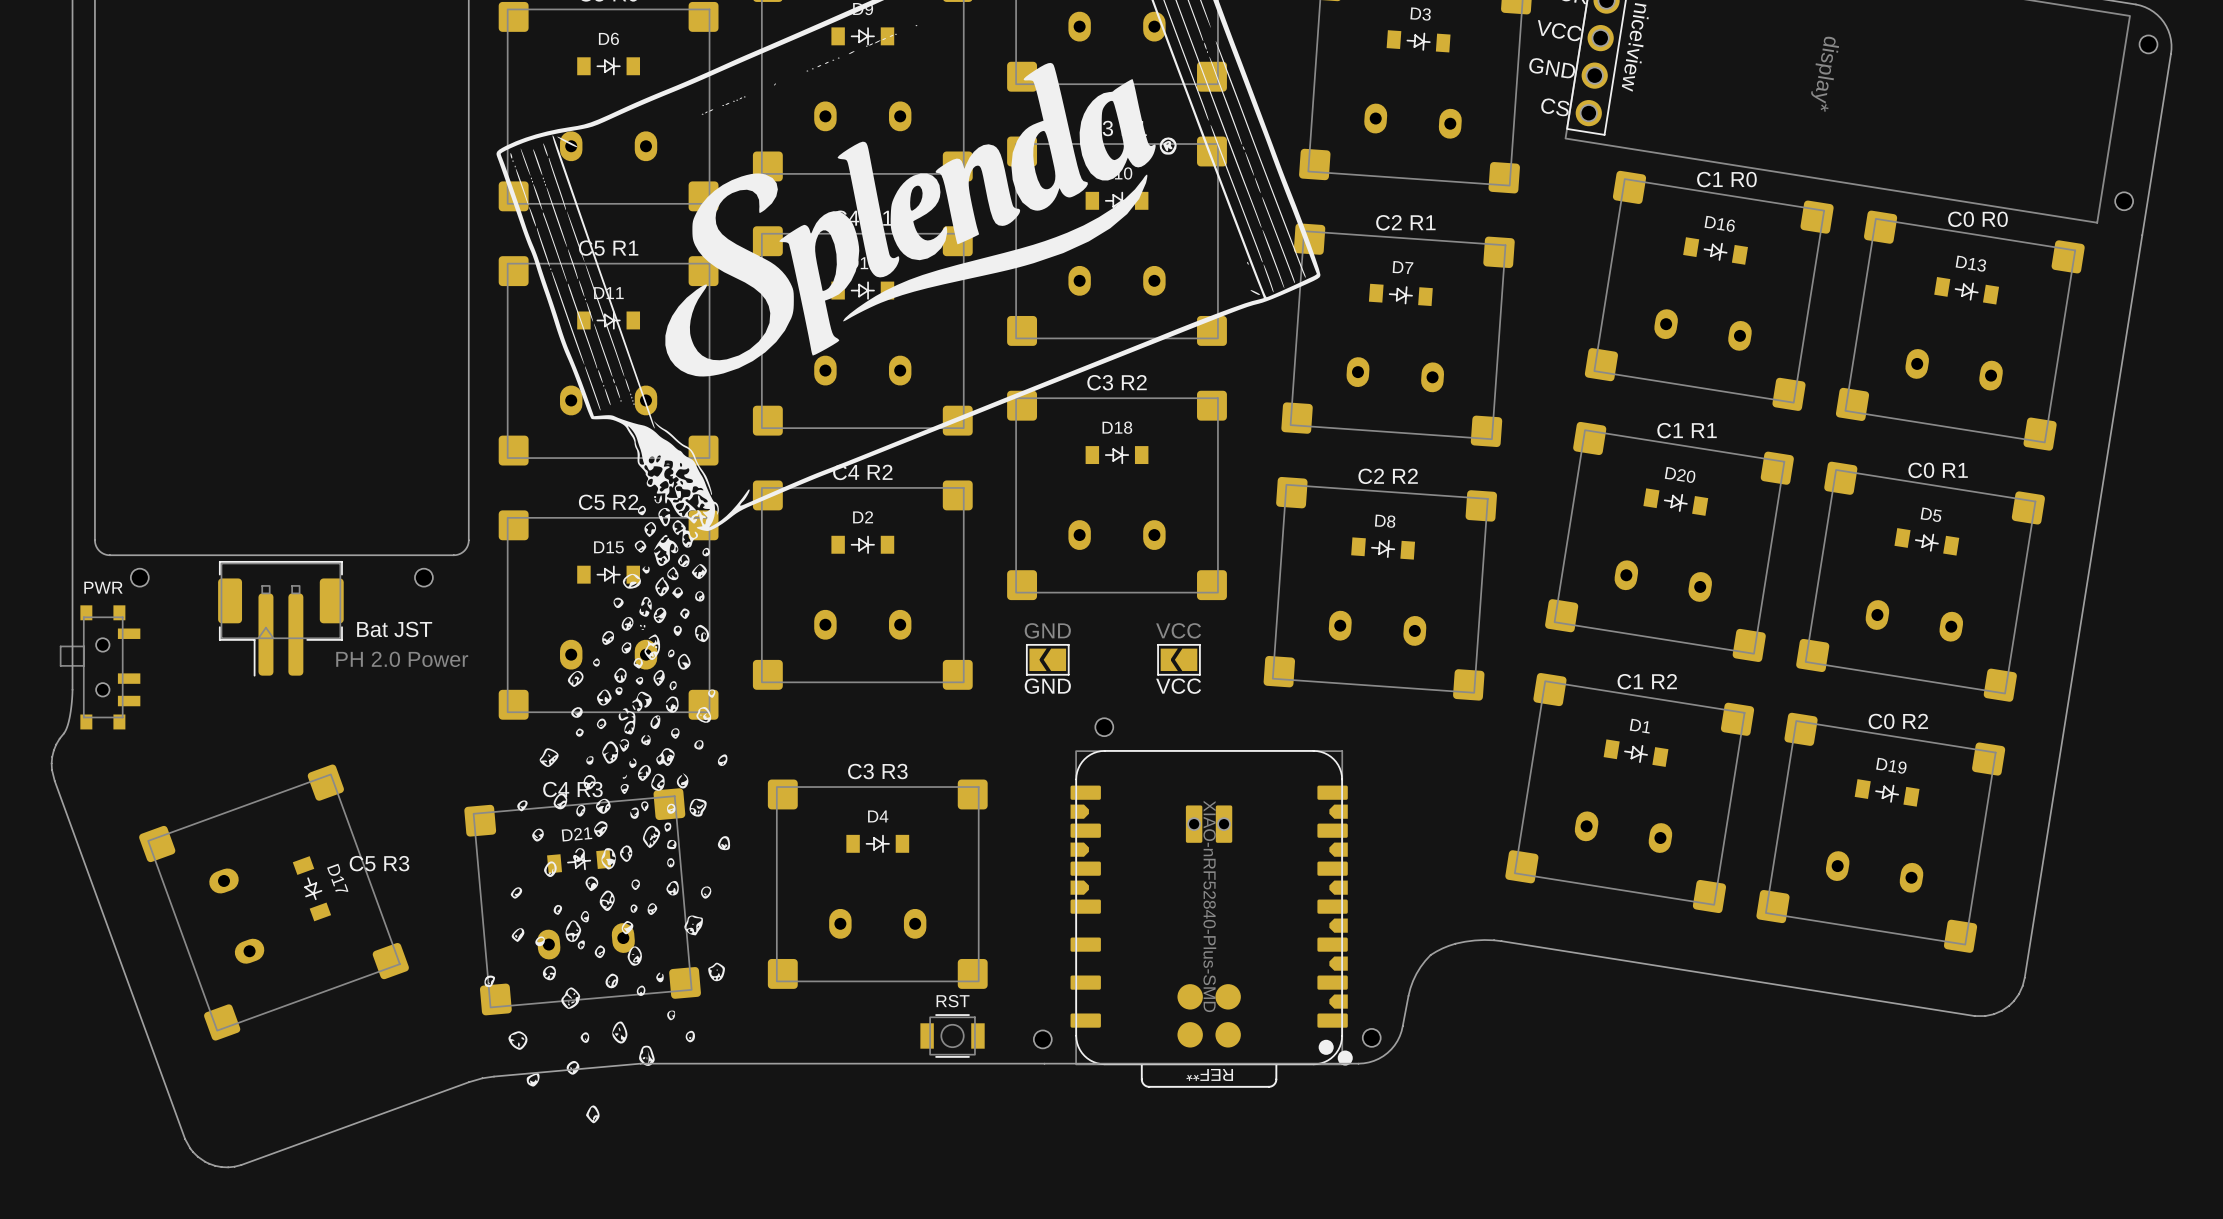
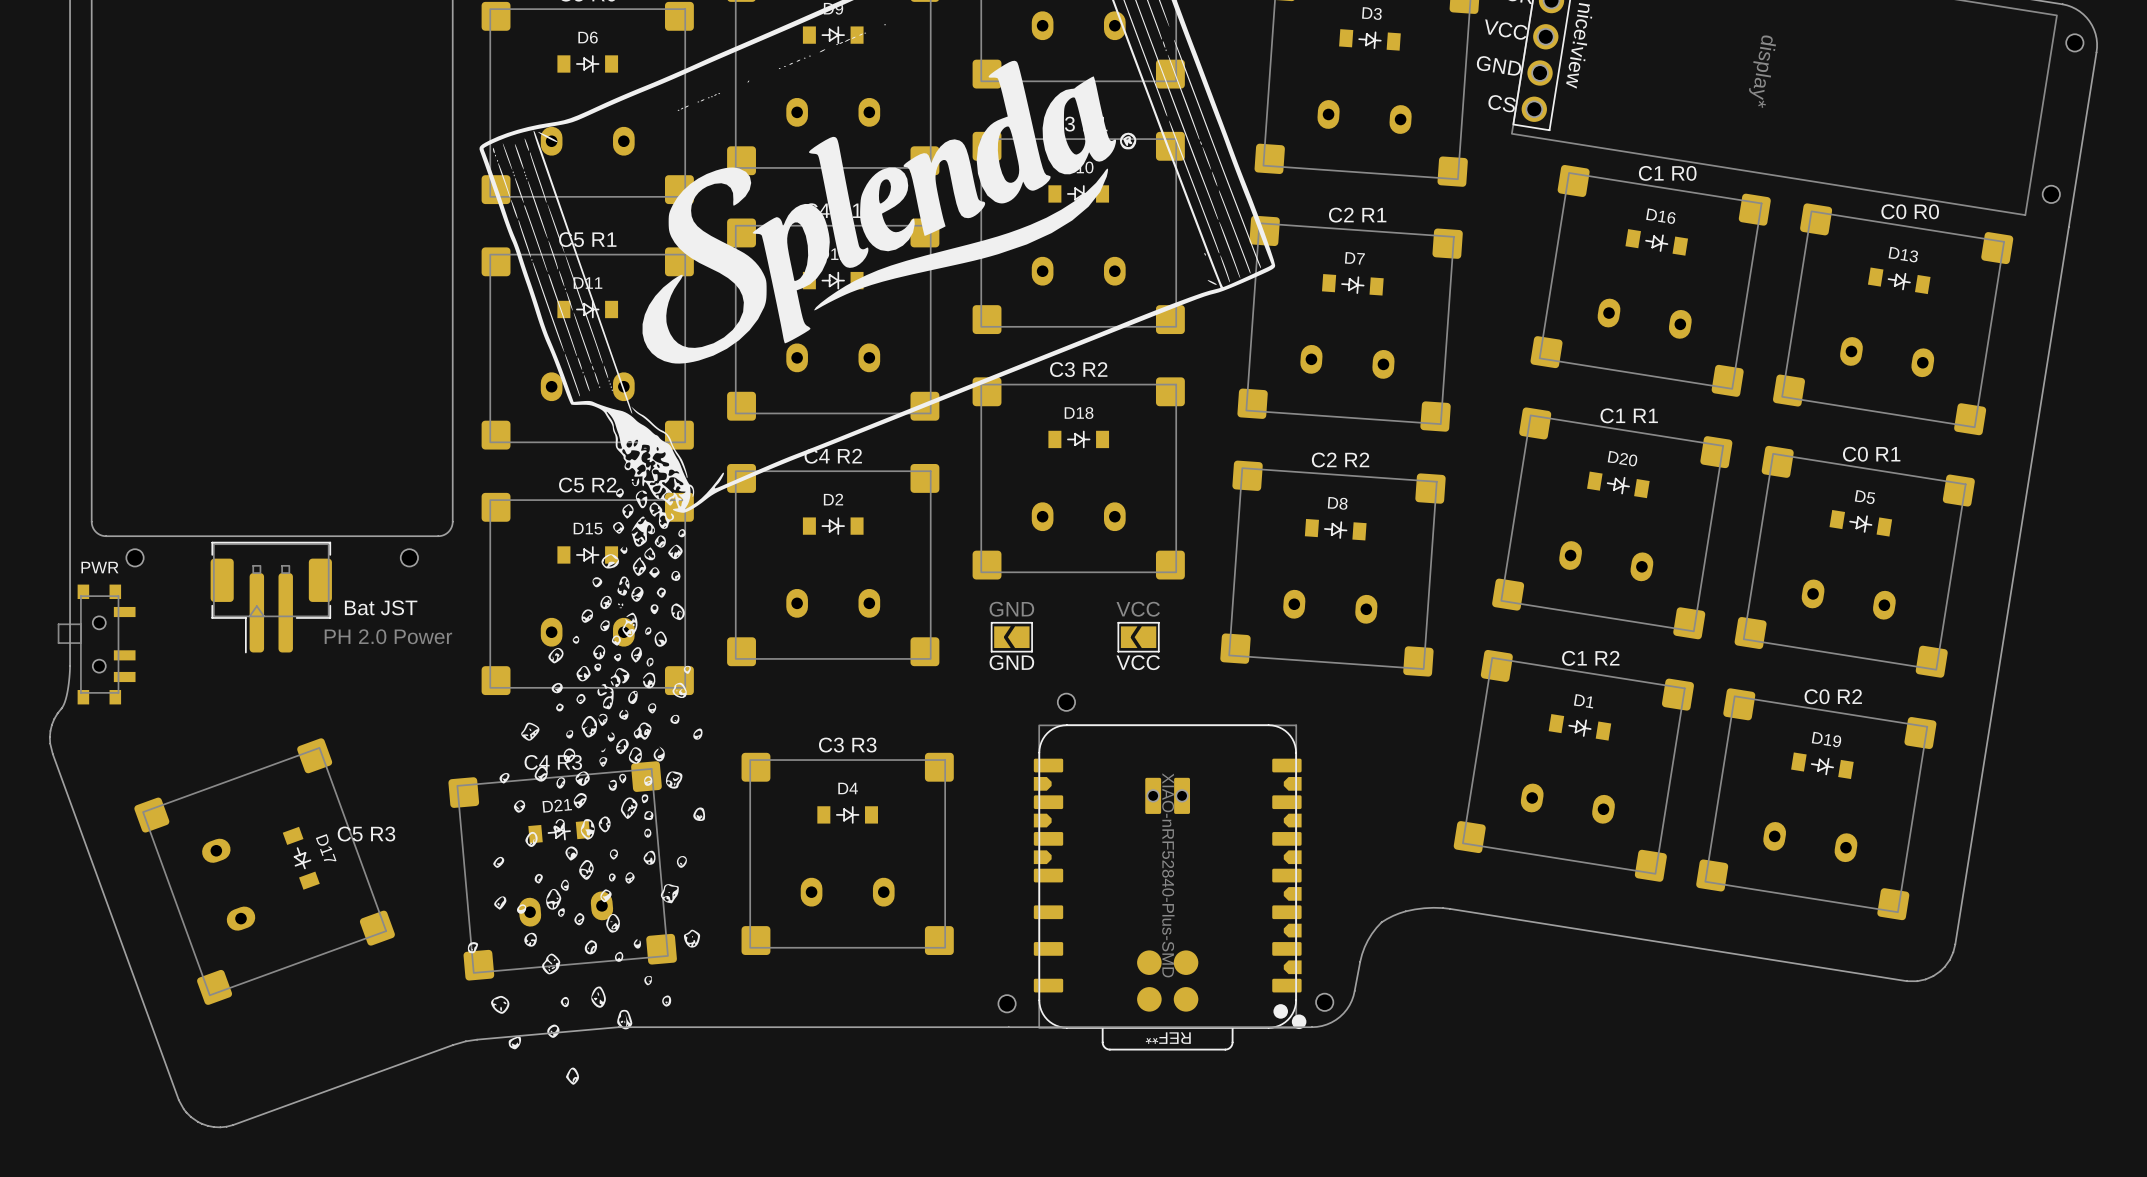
part: (952, 1035) -> none

